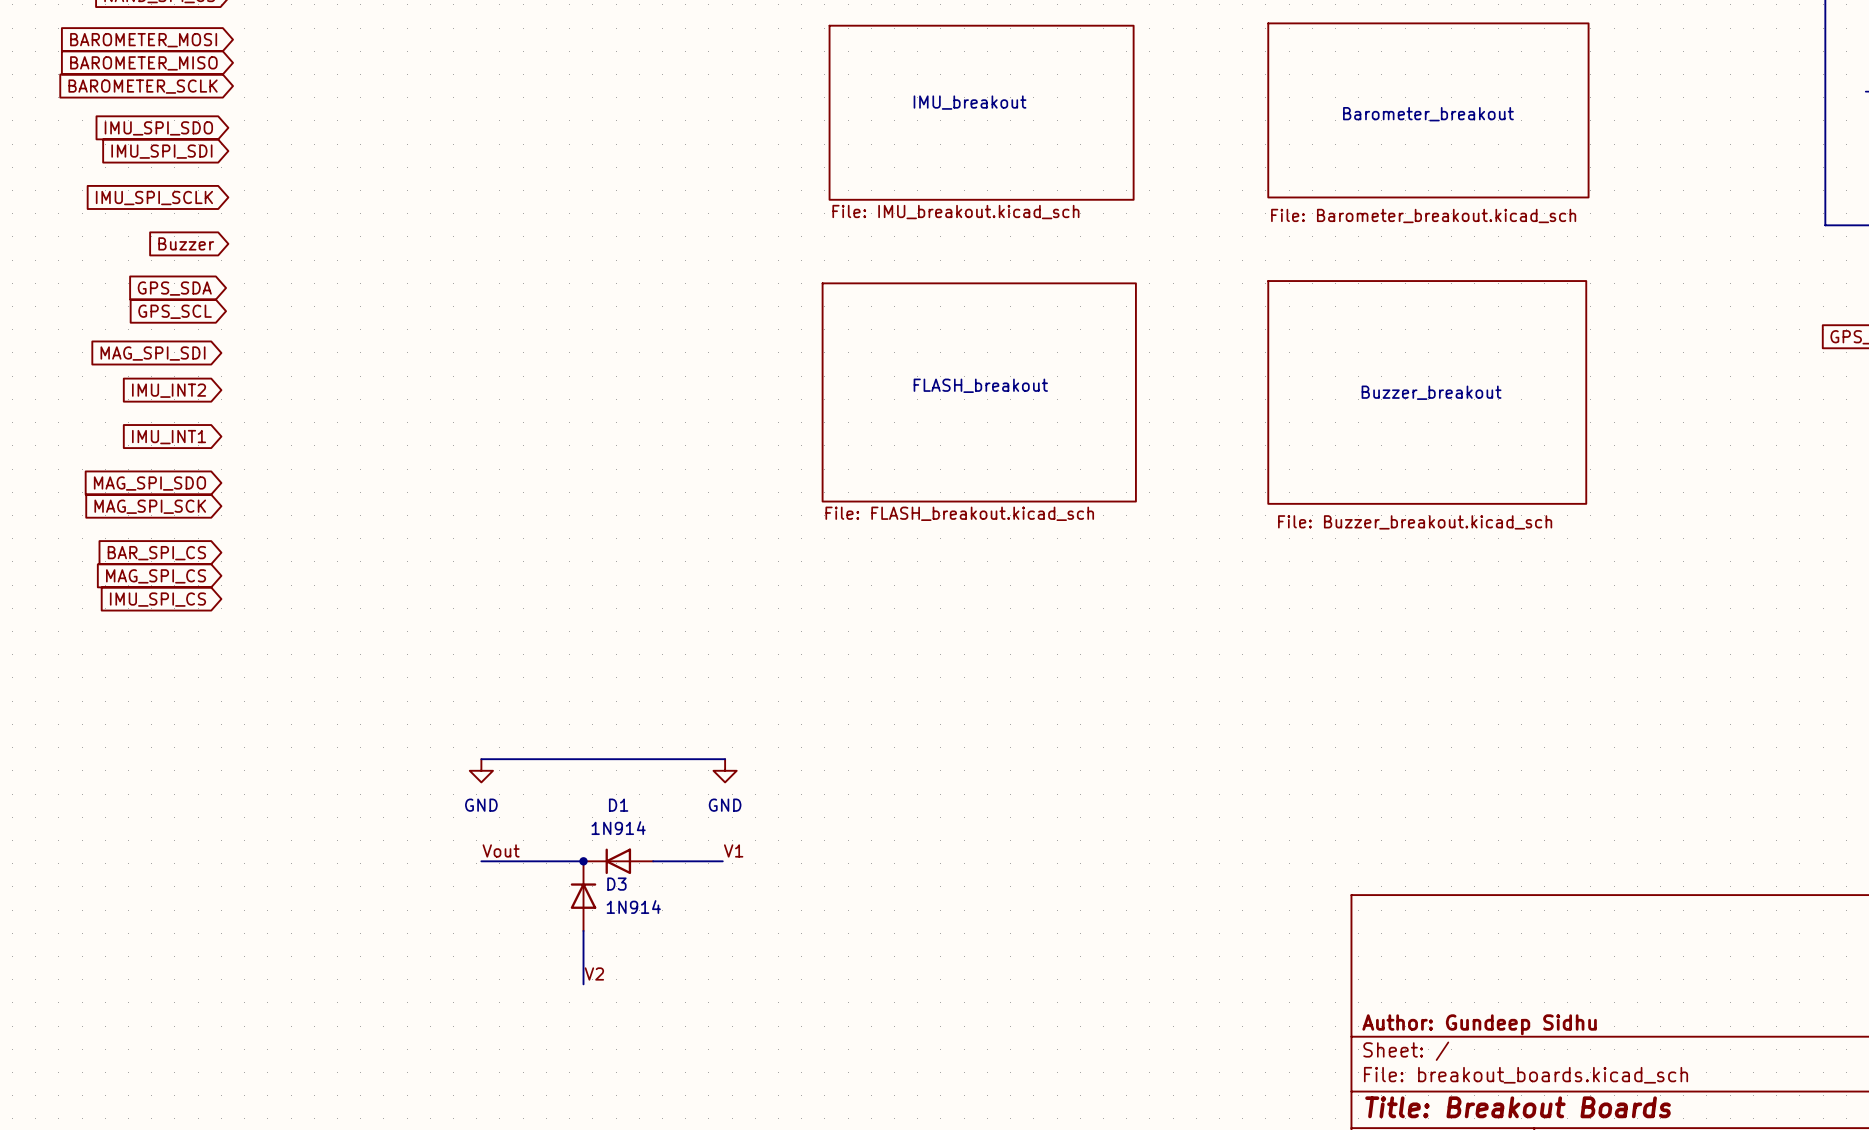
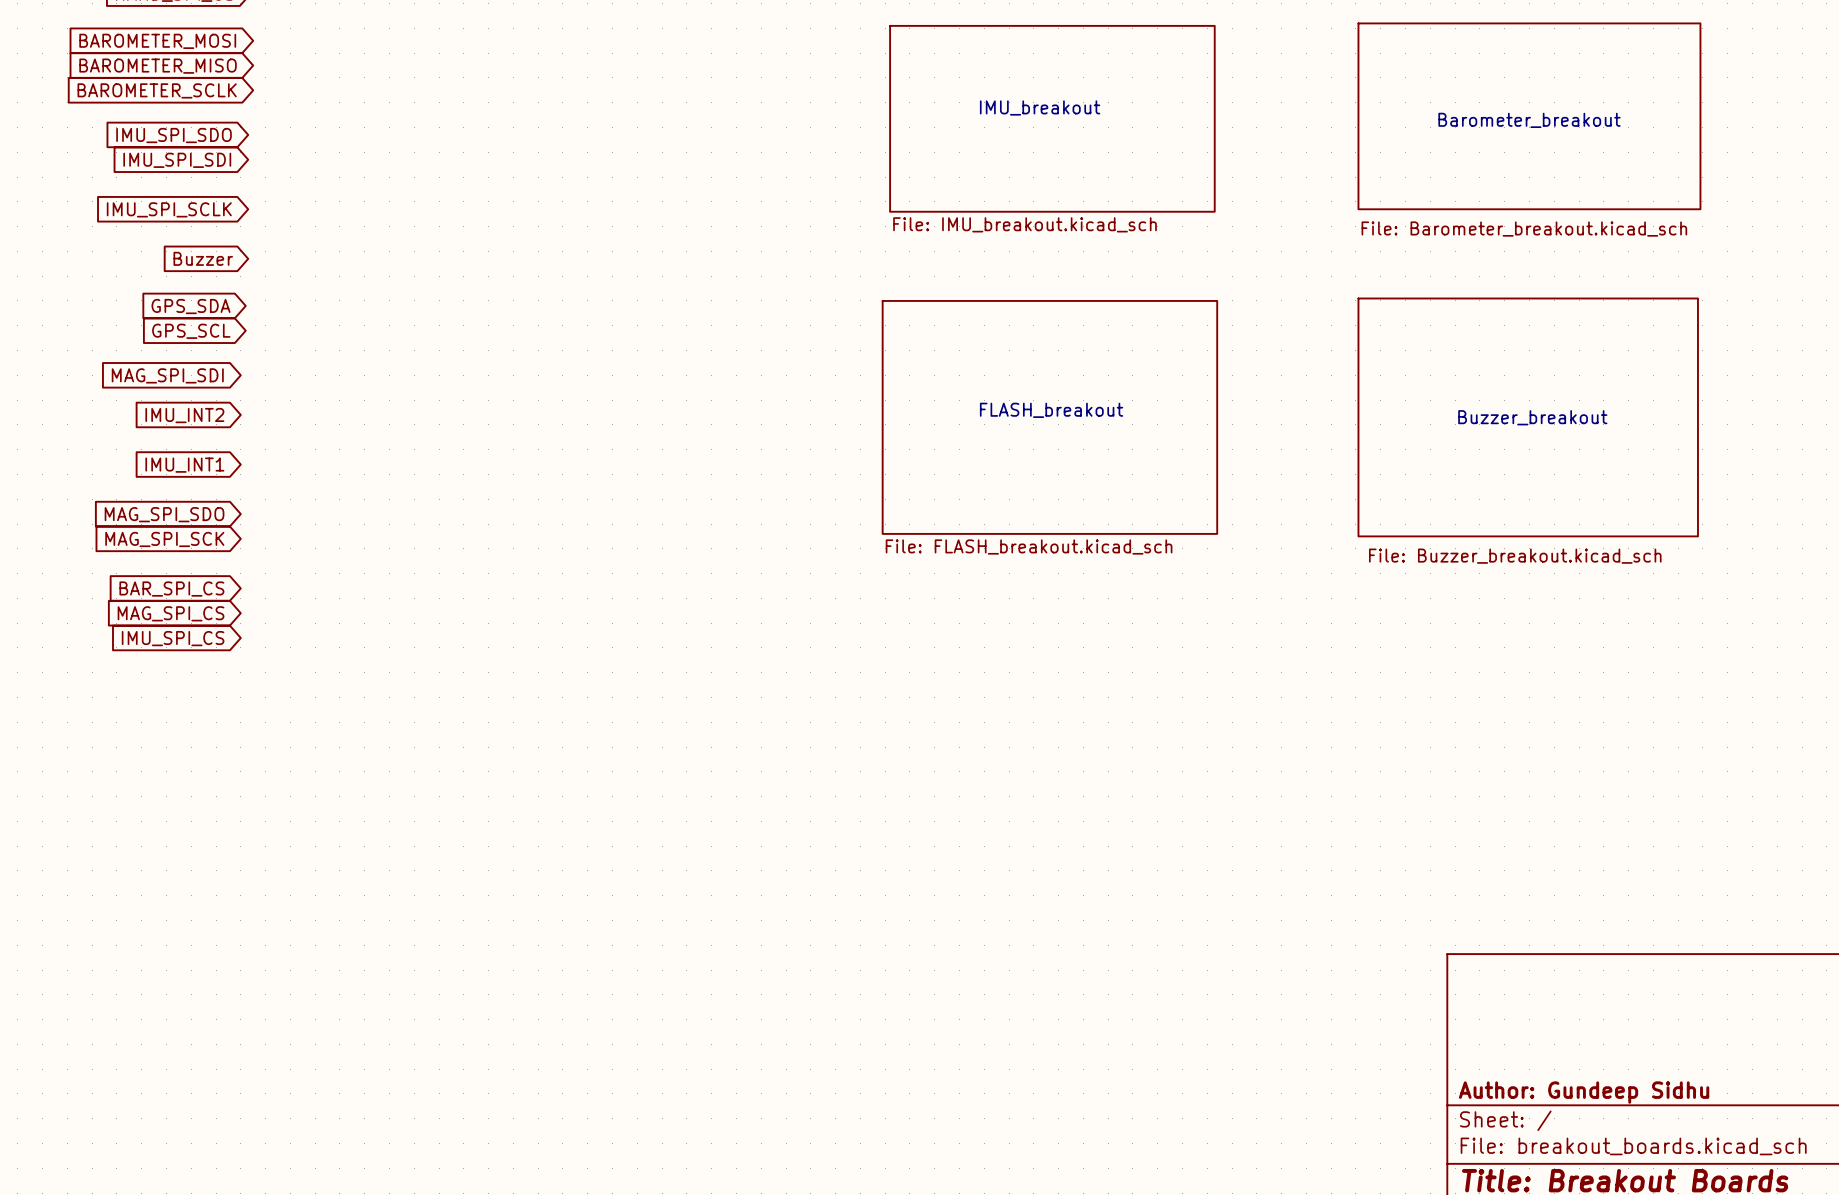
wire: (481, 759) (725, 759) -> none
power symbol: GND (481, 770) -> none
power symbol: GND (725, 770) -> none
label: Vout (501, 850) -> none
label: V1 (733, 850) -> none
wire: (481, 861) (583, 861) -> none
junction: (583, 861) -> none
D1: 1N914 (618, 861) -> none
wire: (653, 861) (722, 861) -> none
D3: 1N914 (583, 896) -> none
wire: (583, 930) (583, 984) -> none
label: V2 (594, 973) -> none

